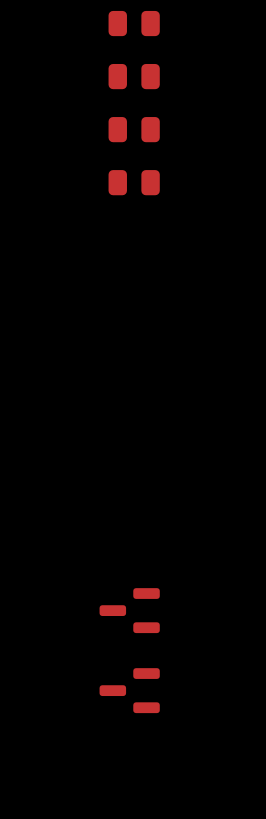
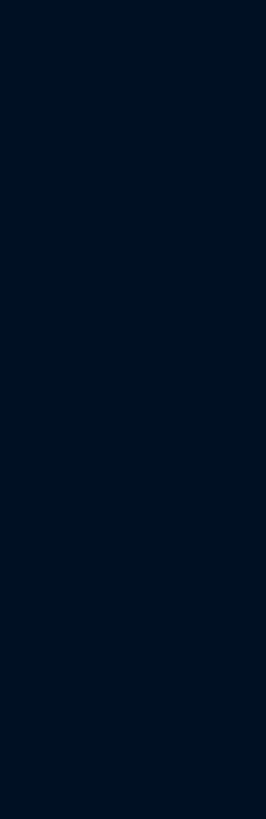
part: (134, 23) -> none
part: (134, 76) -> none
part: (134, 129) -> none
part: (134, 182) -> none
part: (129, 610) -> none
part: (129, 690) -> none

